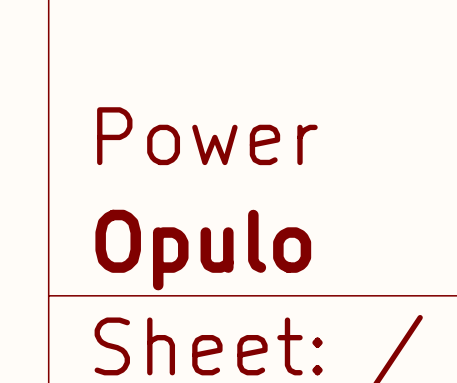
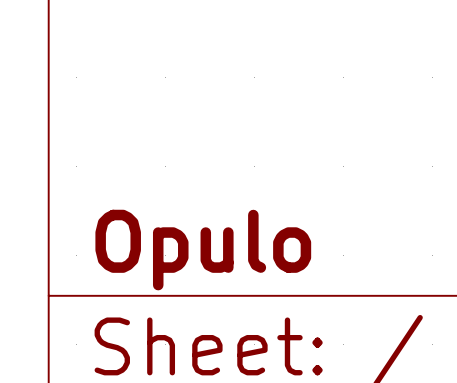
title block: Power (207, 136) -> none

